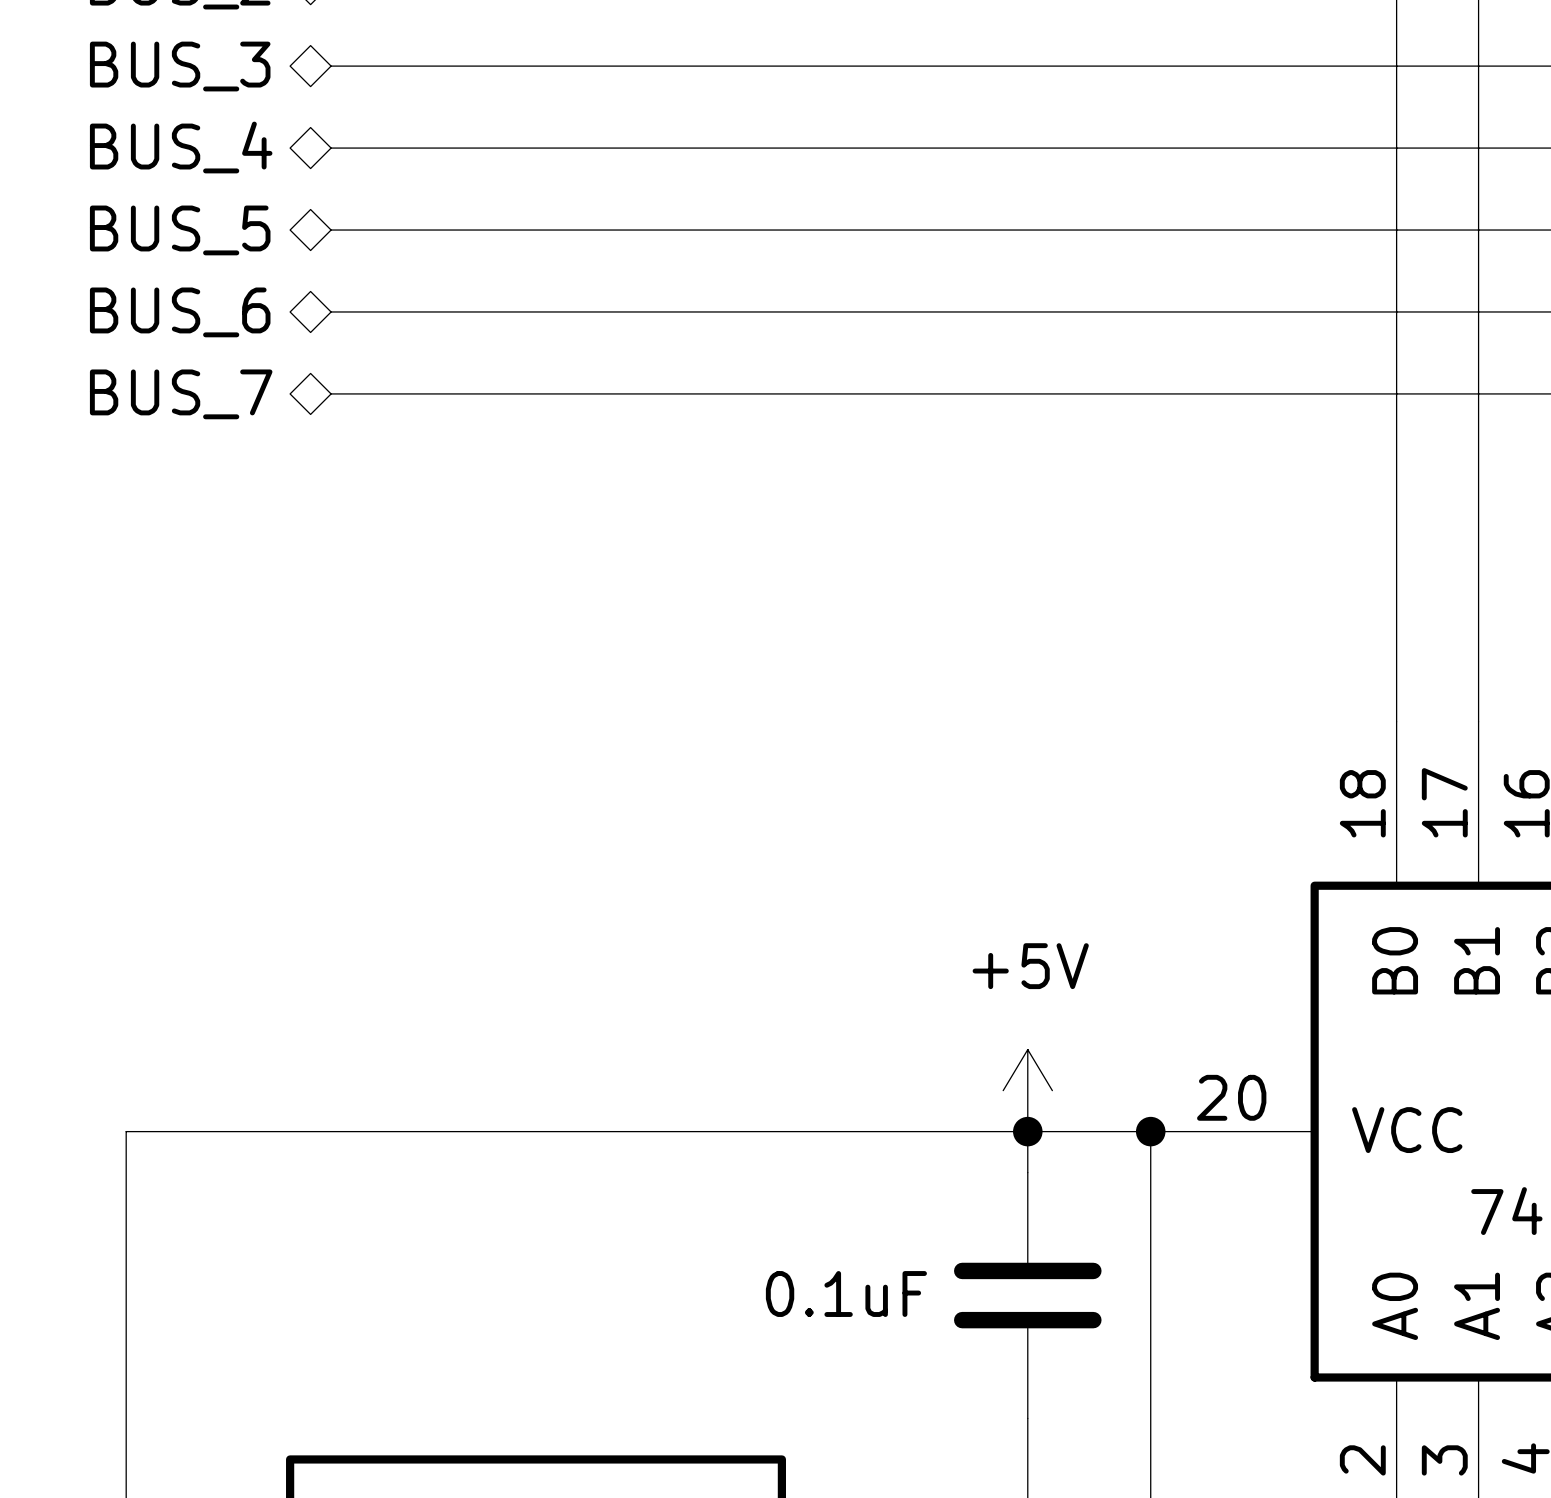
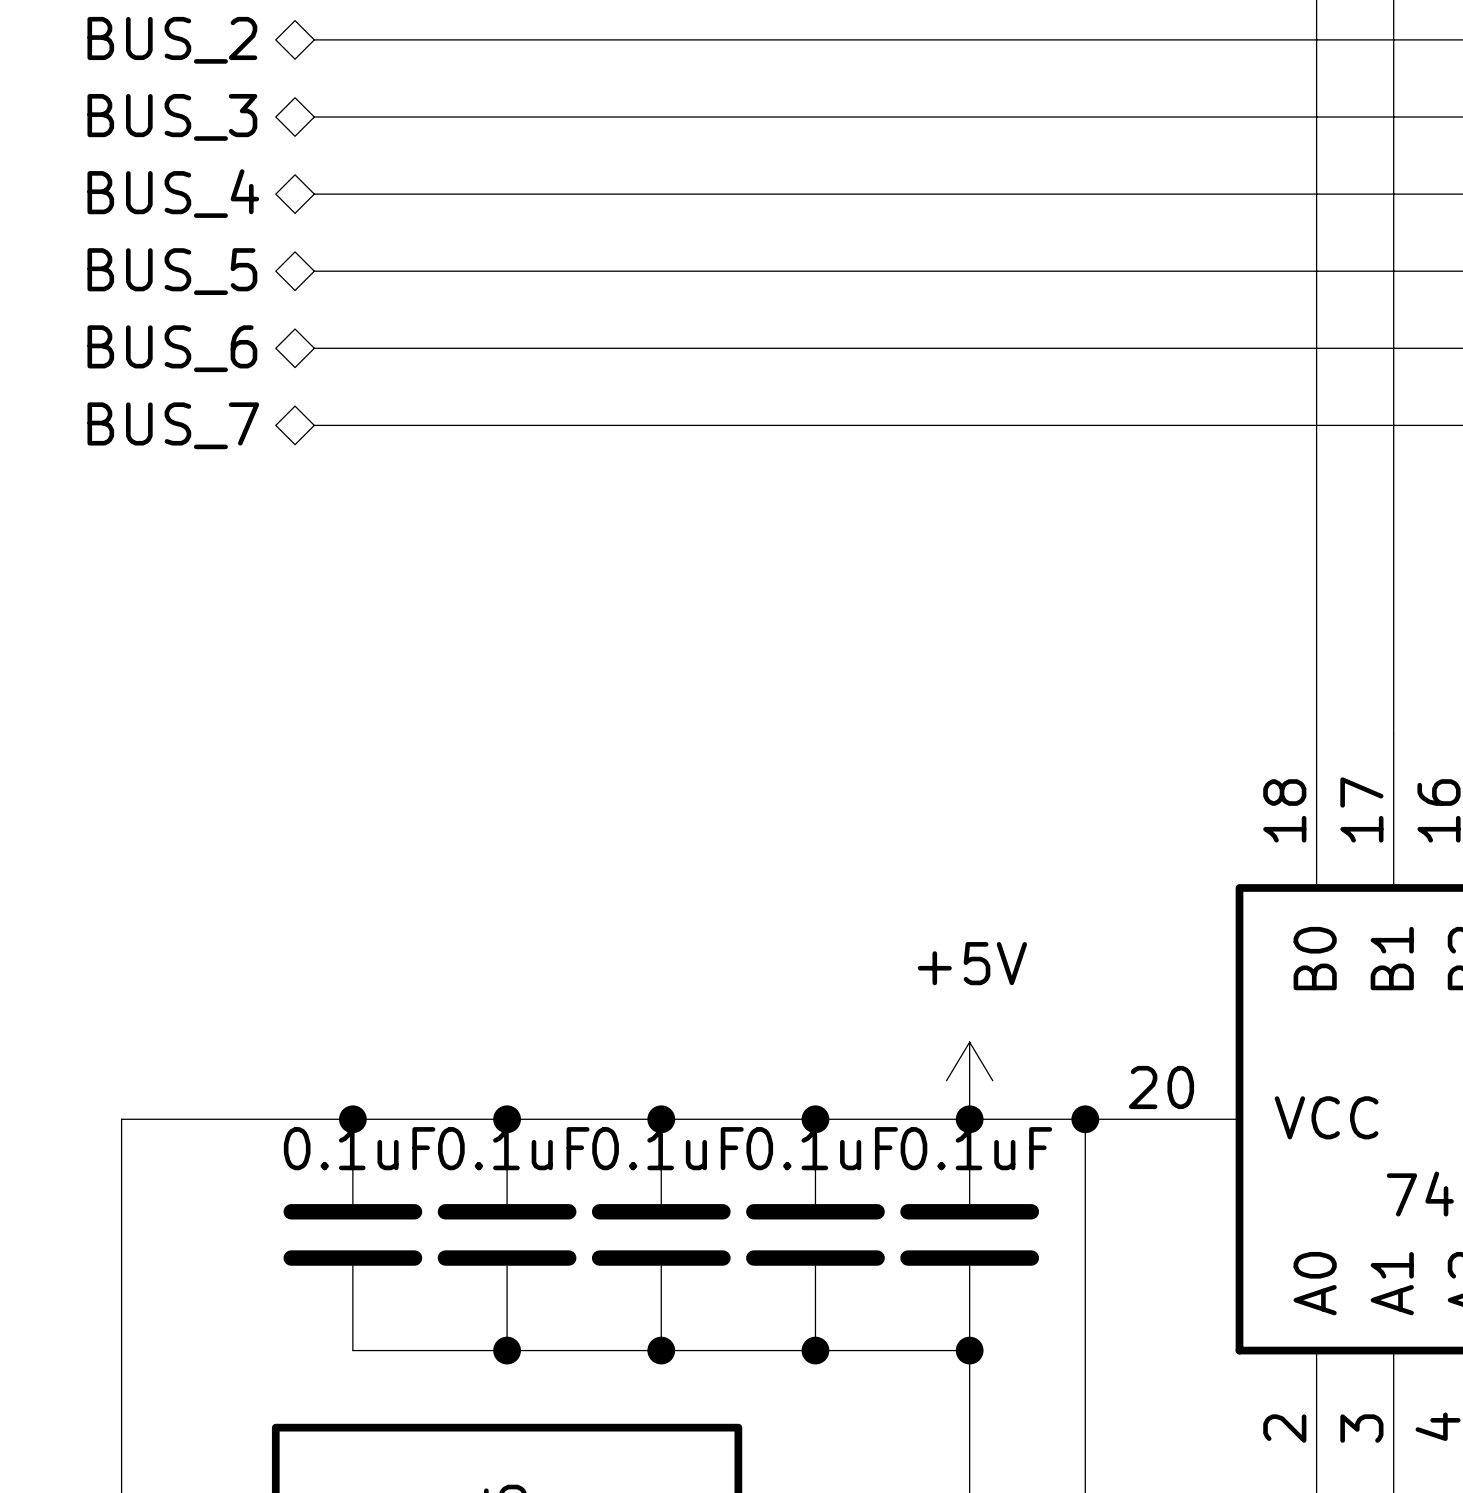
junction: none -> (352, 1119)
junction: none -> (507, 1119)
junction: none -> (661, 1119)
junction: none -> (815, 1119)
part: none -> 0.1uF (352, 1234)
part: none -> 0.1uF (507, 1234)
part: none -> 0.1uF (661, 1234)
part: none -> 0.1uF (815, 1234)
part value position: 0.1uF (846, 1294) -> 0.1uF (976, 1148)
part position: (1027, 1295) -> (969, 1234)
wire: none -> (352, 1350) (969, 1350) (969, 1389)
junction: none -> (507, 1350)
junction: none -> (661, 1350)
junction: none -> (815, 1350)
junction: none -> (969, 1350)

